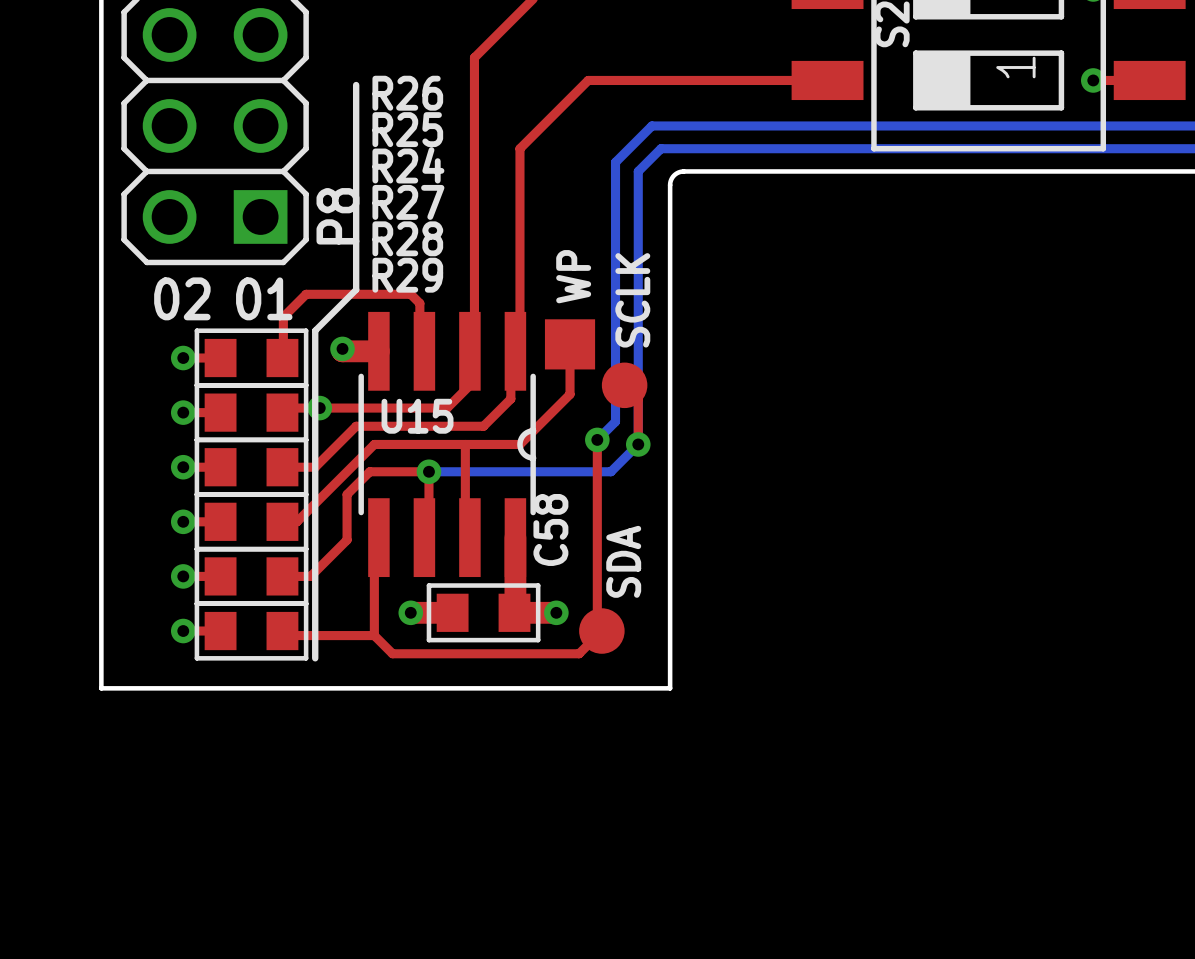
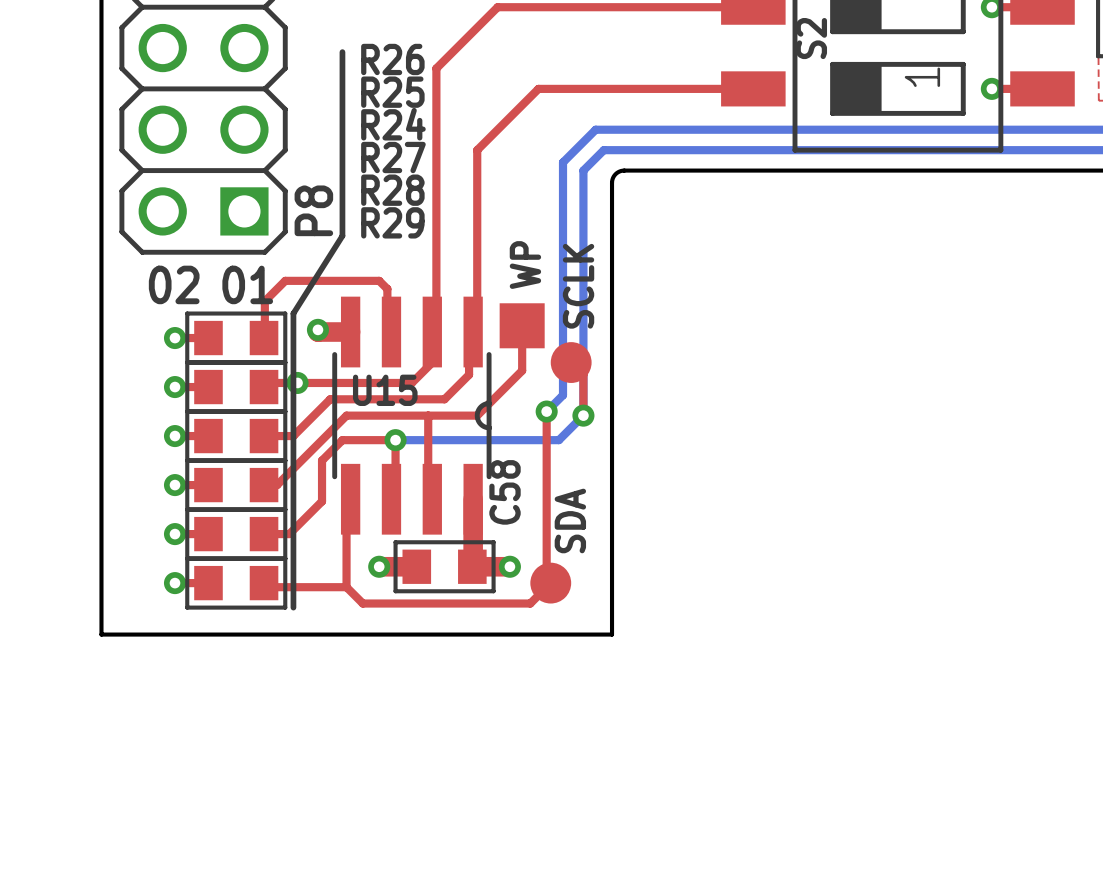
line: (356, 85) (356, 289) (315, 330) -> (342, 52) (342, 235) (293, 313)
R26 name position: R26 (407, 93) -> R26 (392, 59)
R25 name position: R25 (407, 129) -> R25 (392, 92)
R24 name position: R24 (408, 165) -> R24 (393, 124)
R27 name position: R27 (408, 202) -> R27 (393, 157)
R28 name position: R28 (407, 238) -> R28 (392, 190)
R29 name position: R29 (407, 275) -> R29 (392, 222)

